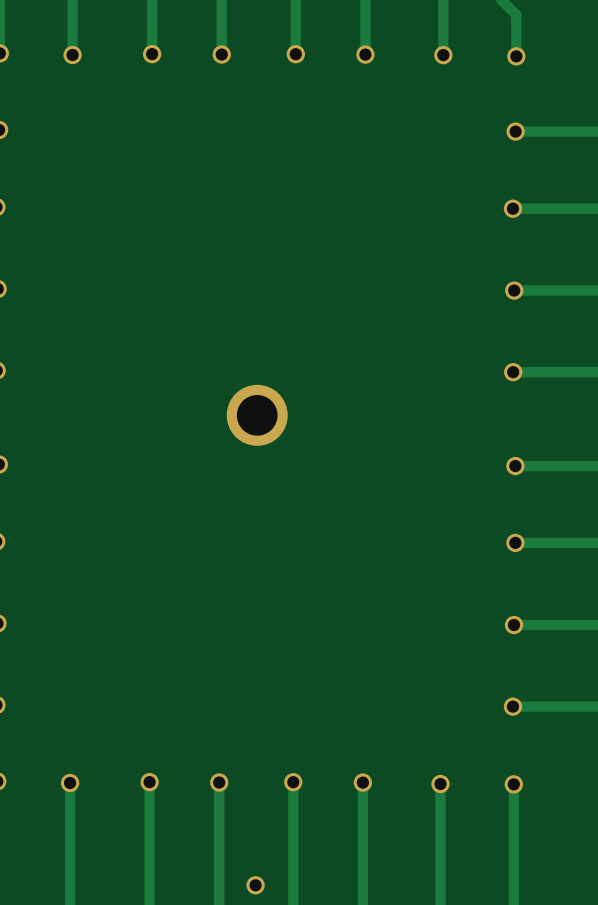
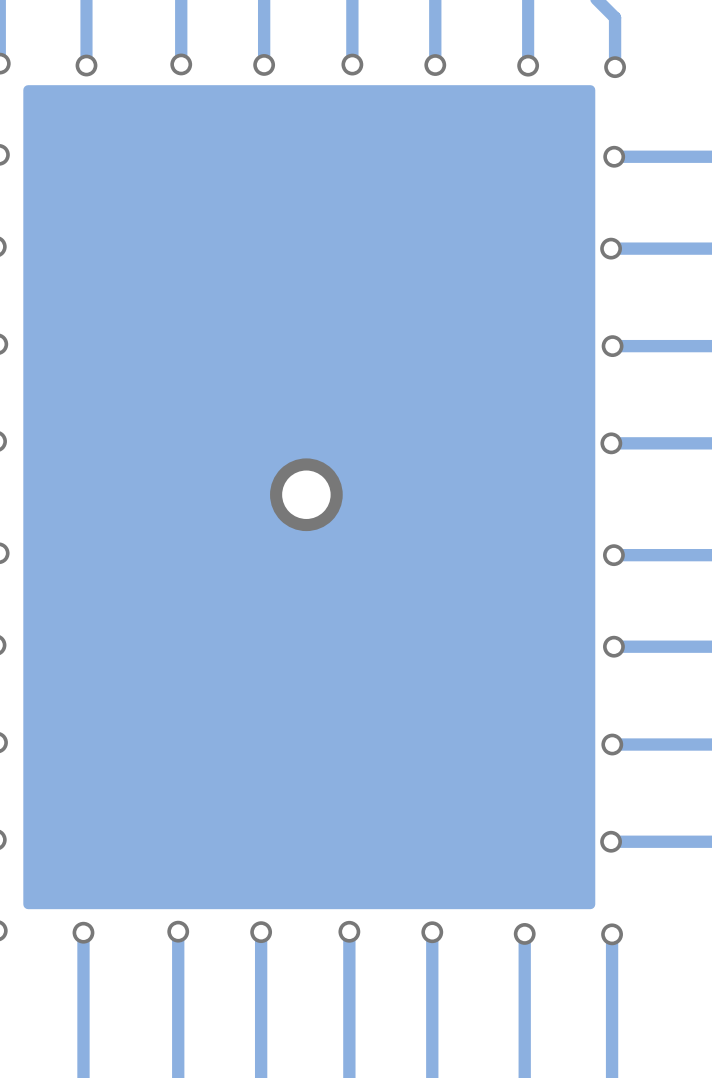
drawing: none -> [23, 85, 596, 910]
via: (255, 885) -> none

